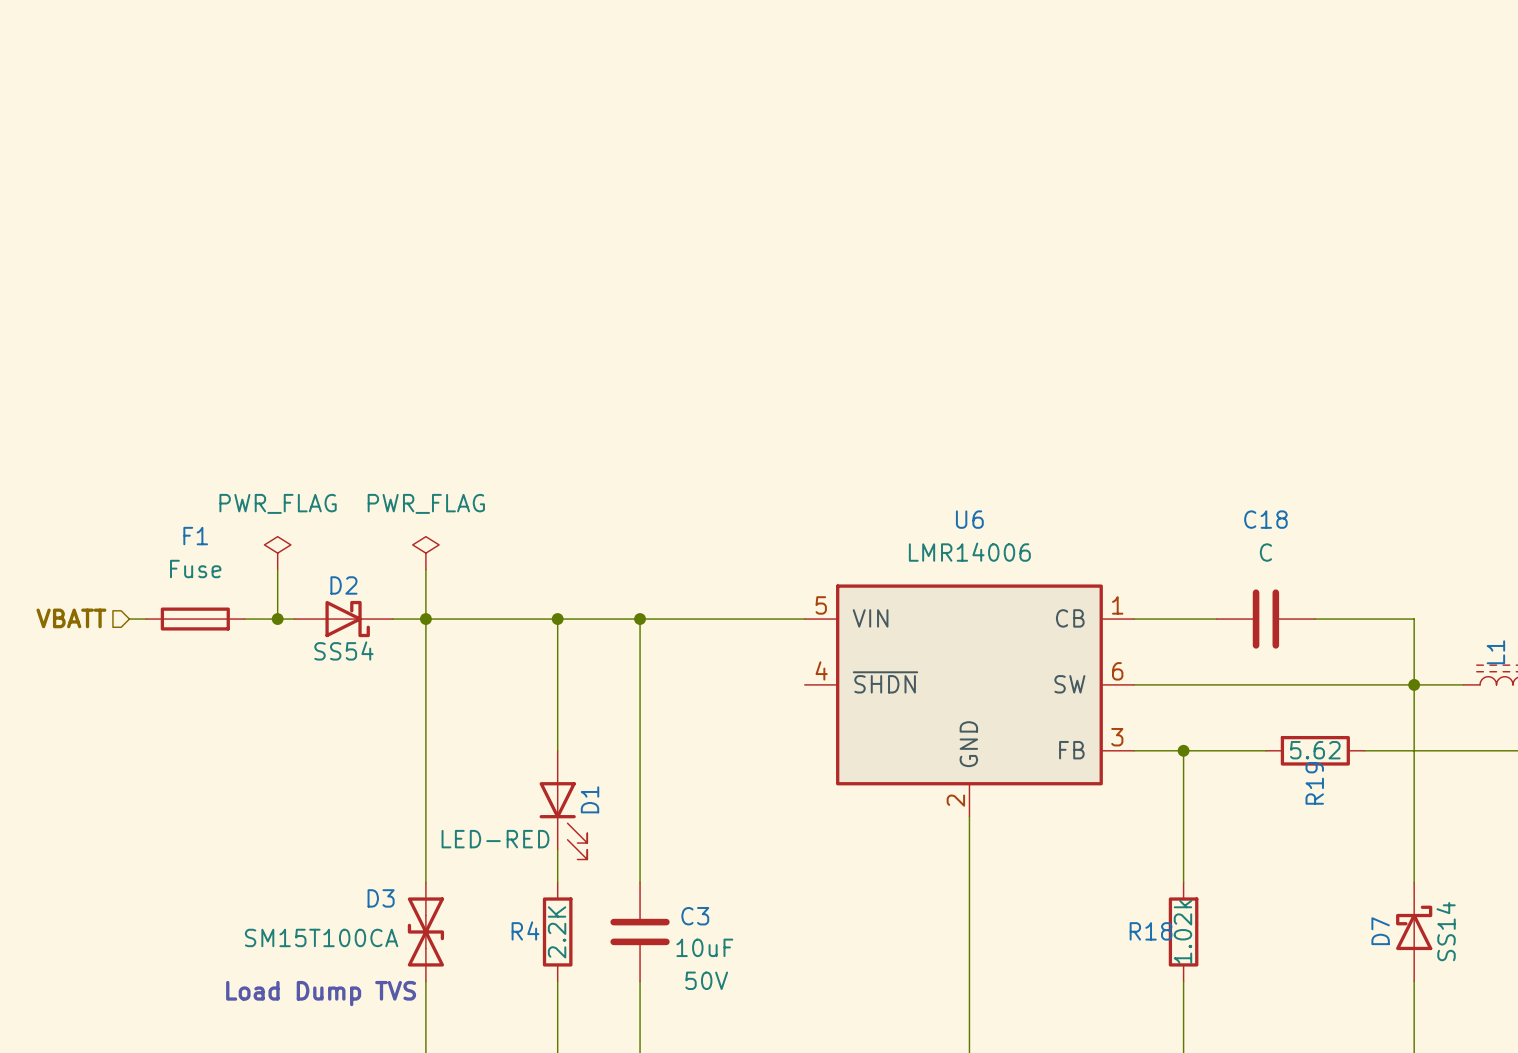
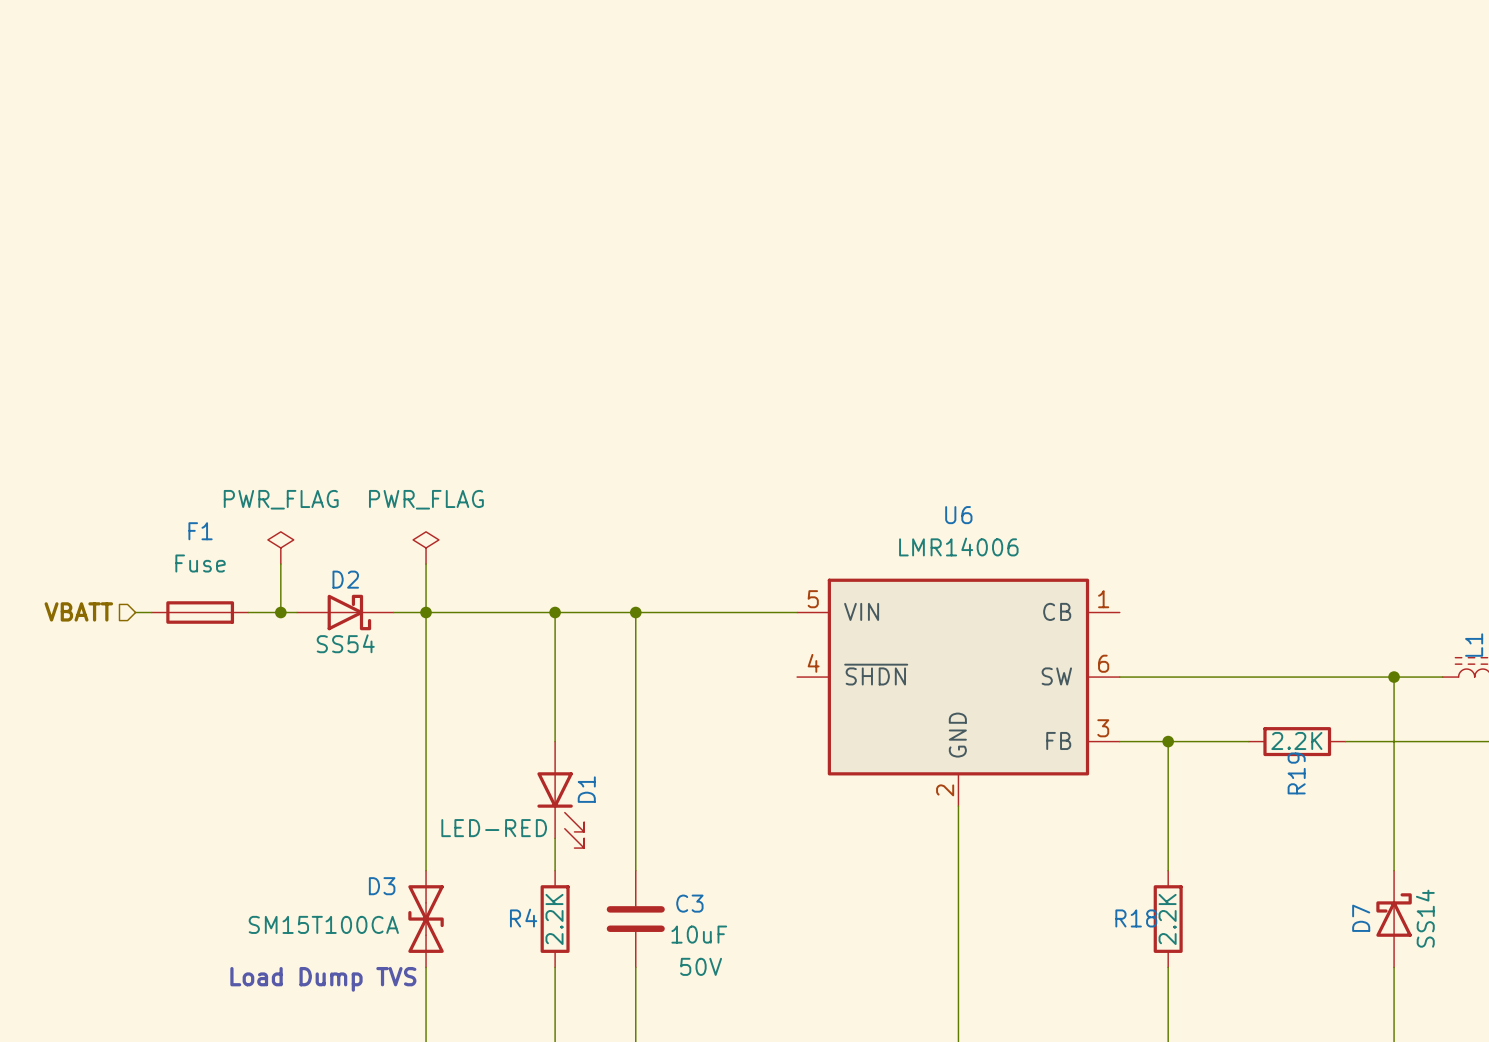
wire: (1134, 619) (1216, 619) -> none
C18: C (1265, 619) -> none
wire: (1315, 619) (1414, 619) (1414, 684) -> none
R19 value: 5.62 (1315, 750) -> 2.2K (1296, 740)
R18 value: 1.02k (1182, 931) -> 2.2K (1167, 919)

